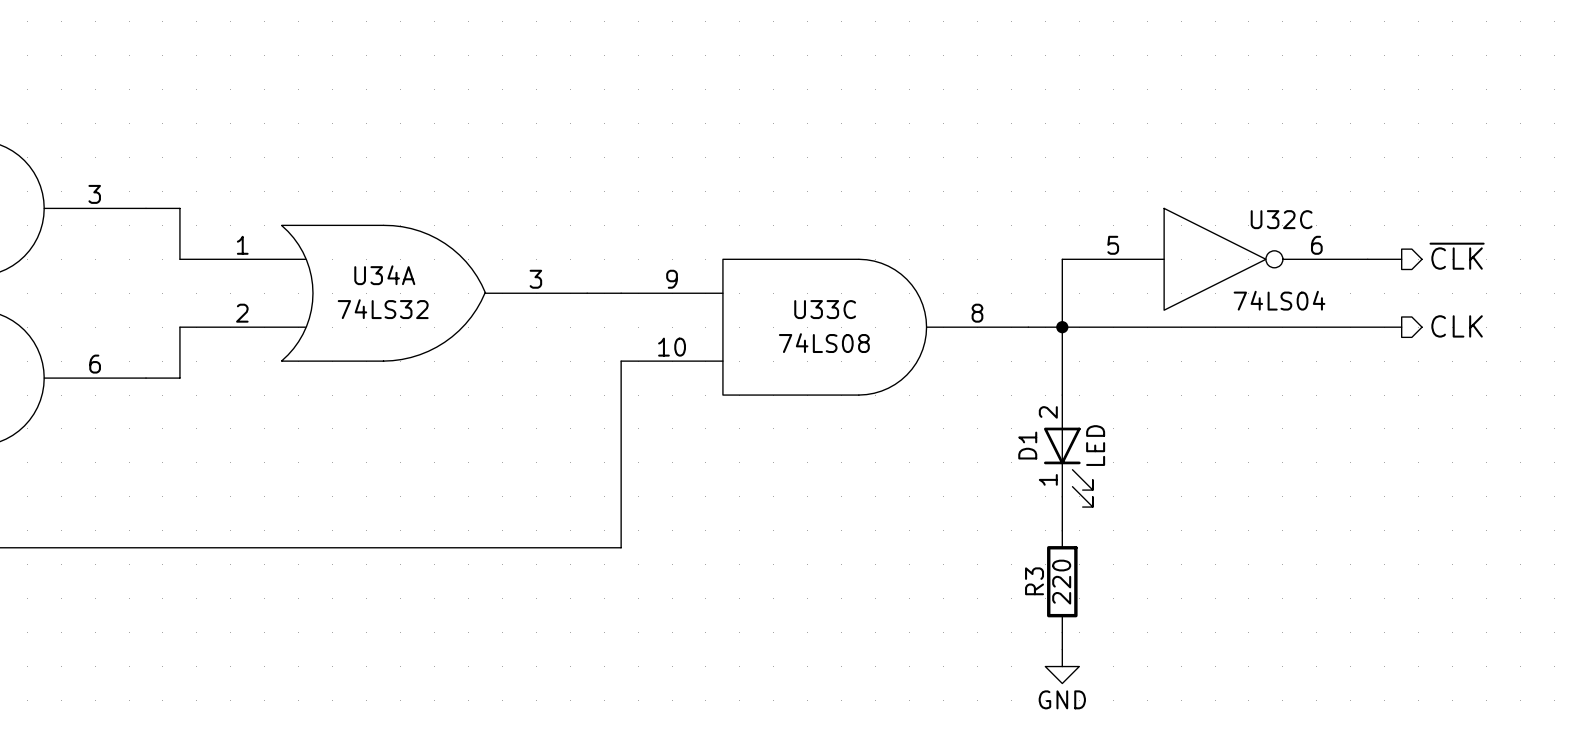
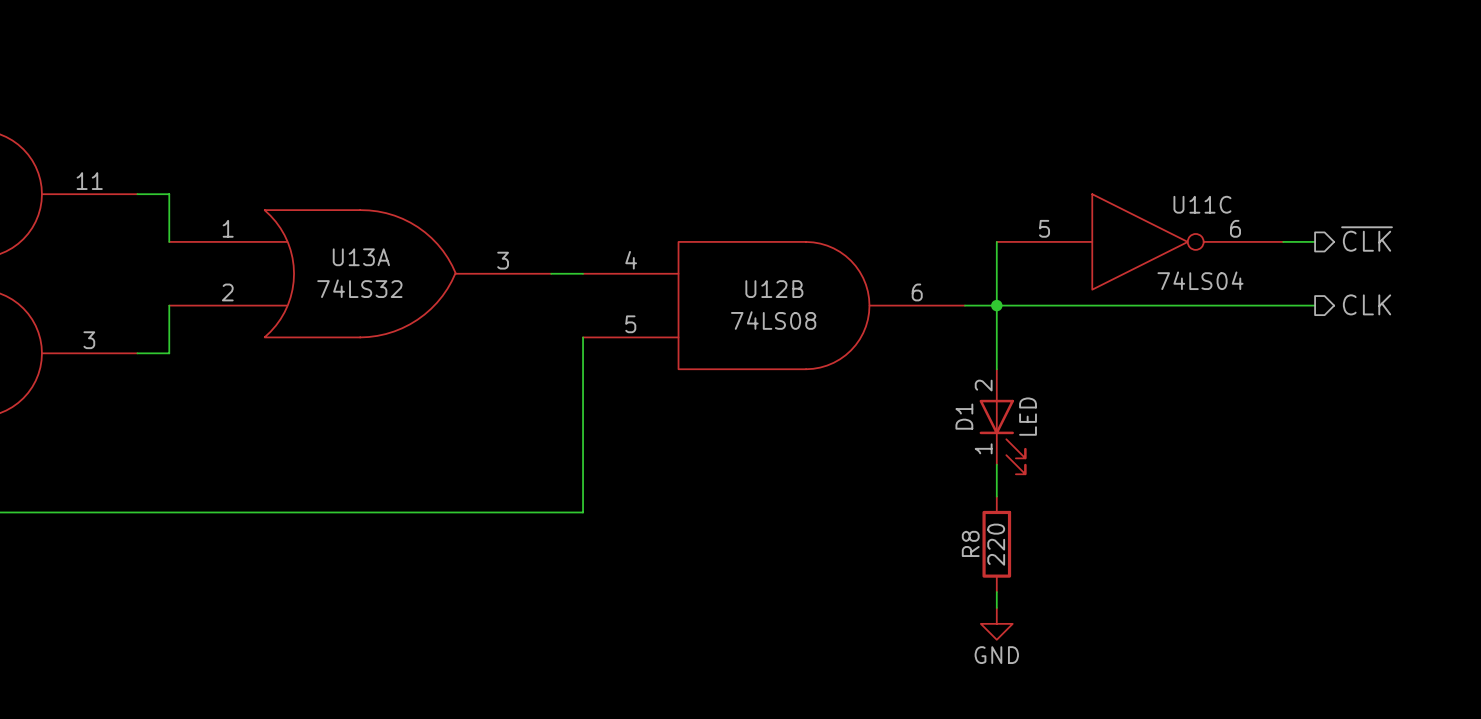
part pin number: 3 (94, 194) -> 11 (89, 181)
U32C name: U32C (1281, 219) -> U11C (1202, 204)
U34A name: U34A (384, 275) -> U13A (361, 257)
U33C pin number: 9 (672, 279) -> 4 (631, 260)
U33C name: U33C (825, 309) -> U12B (774, 289)
U33C pin number: 8 (977, 313) -> 6 (917, 292)
U33C pin number: 10 (672, 347) -> 5 (630, 324)
part pin number: 6 (95, 364) -> 3 (89, 340)
R3 name: R3 (1034, 581) -> R8 (970, 543)

